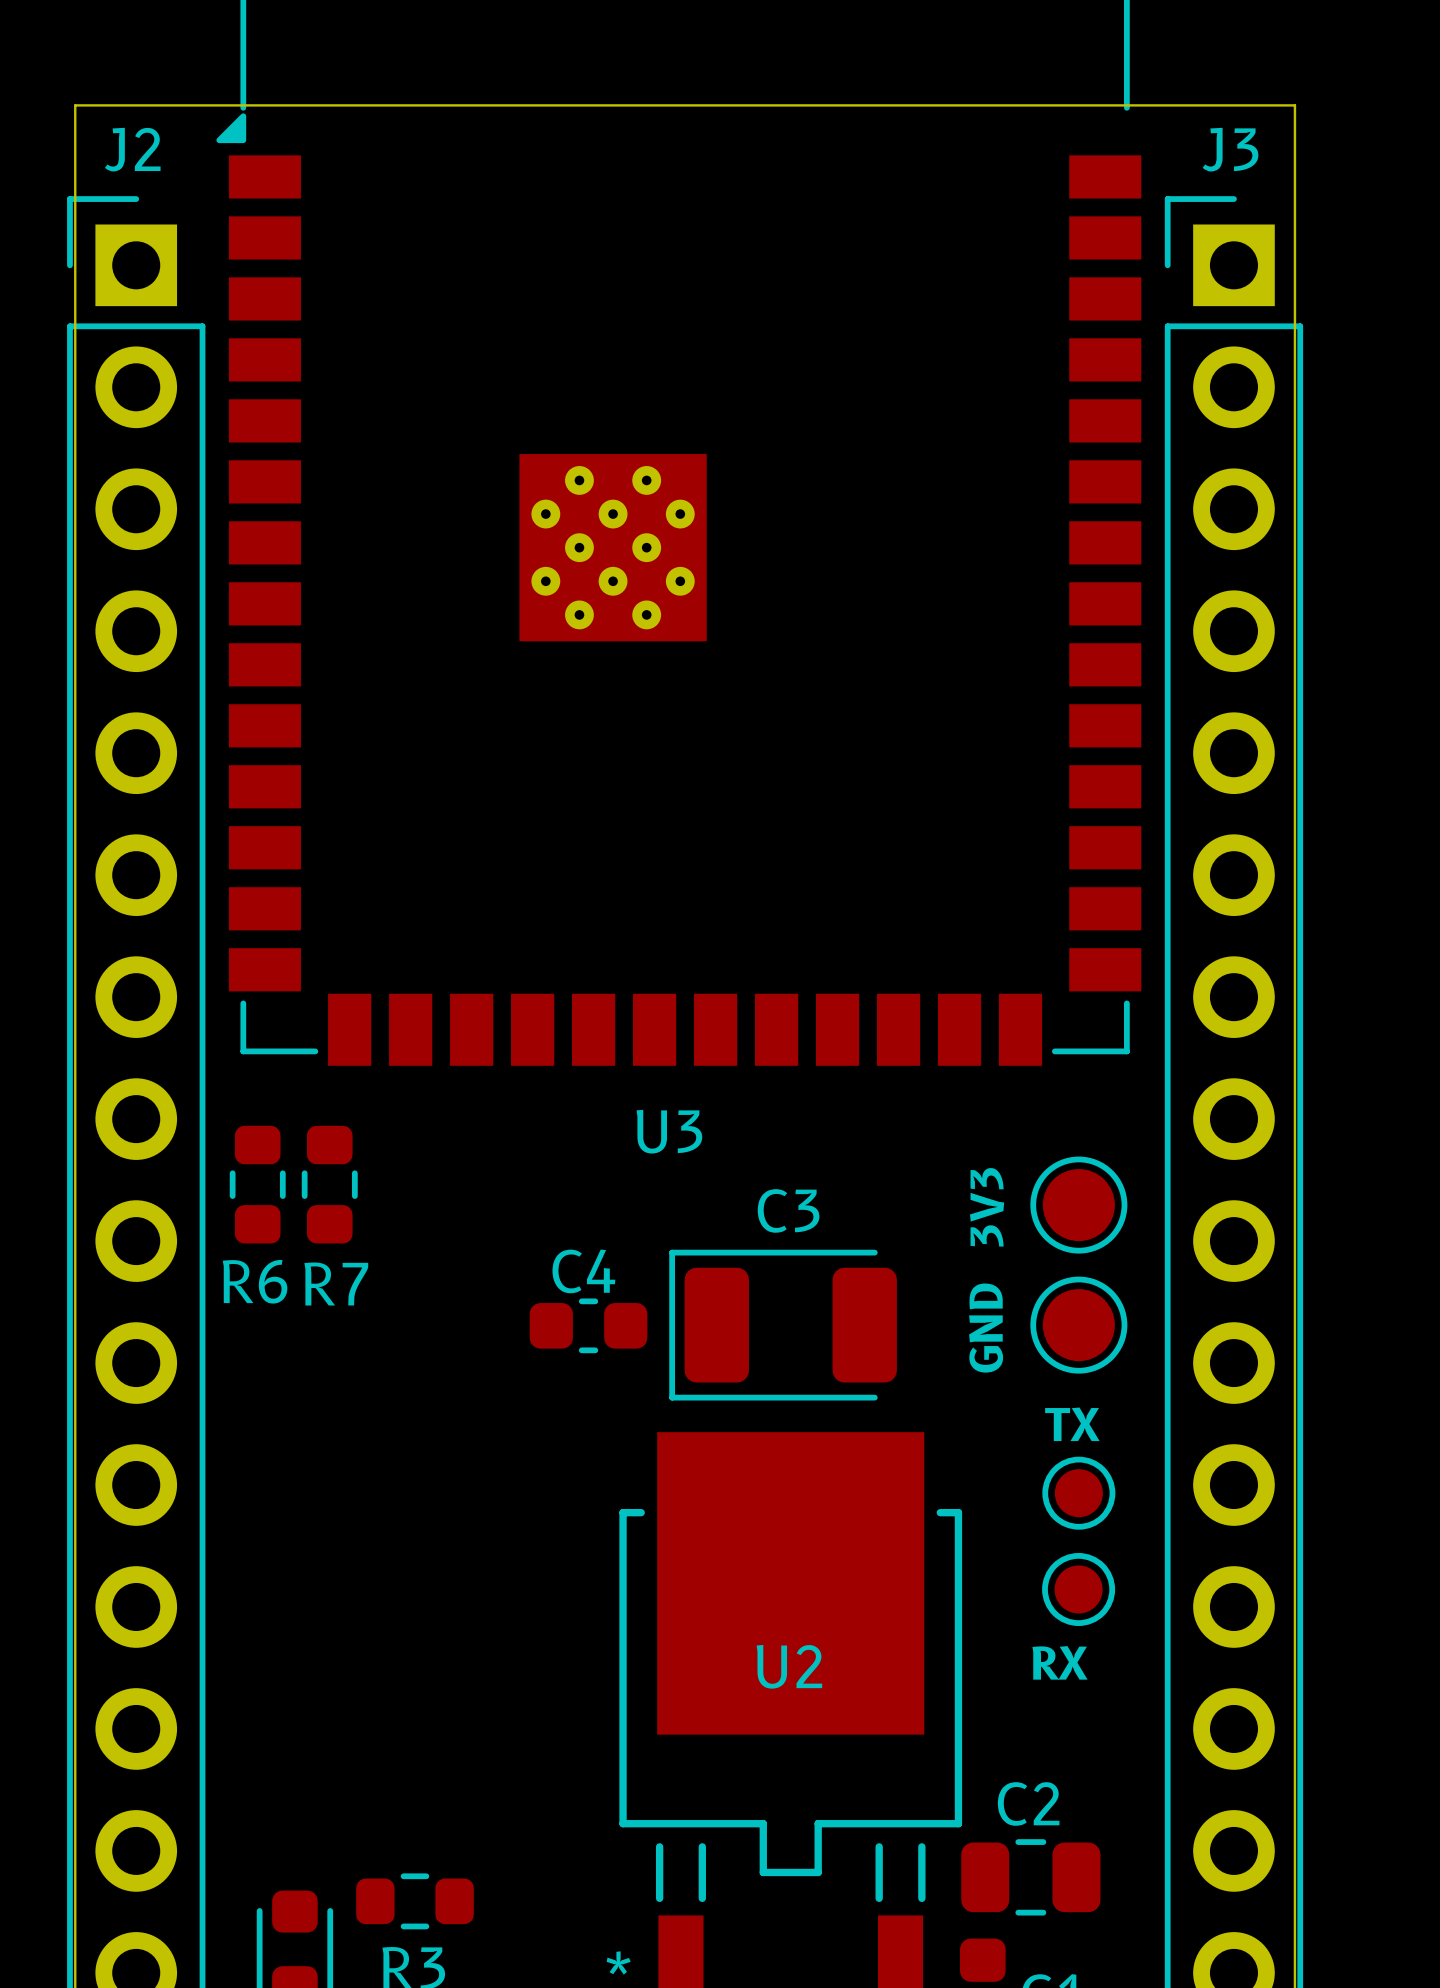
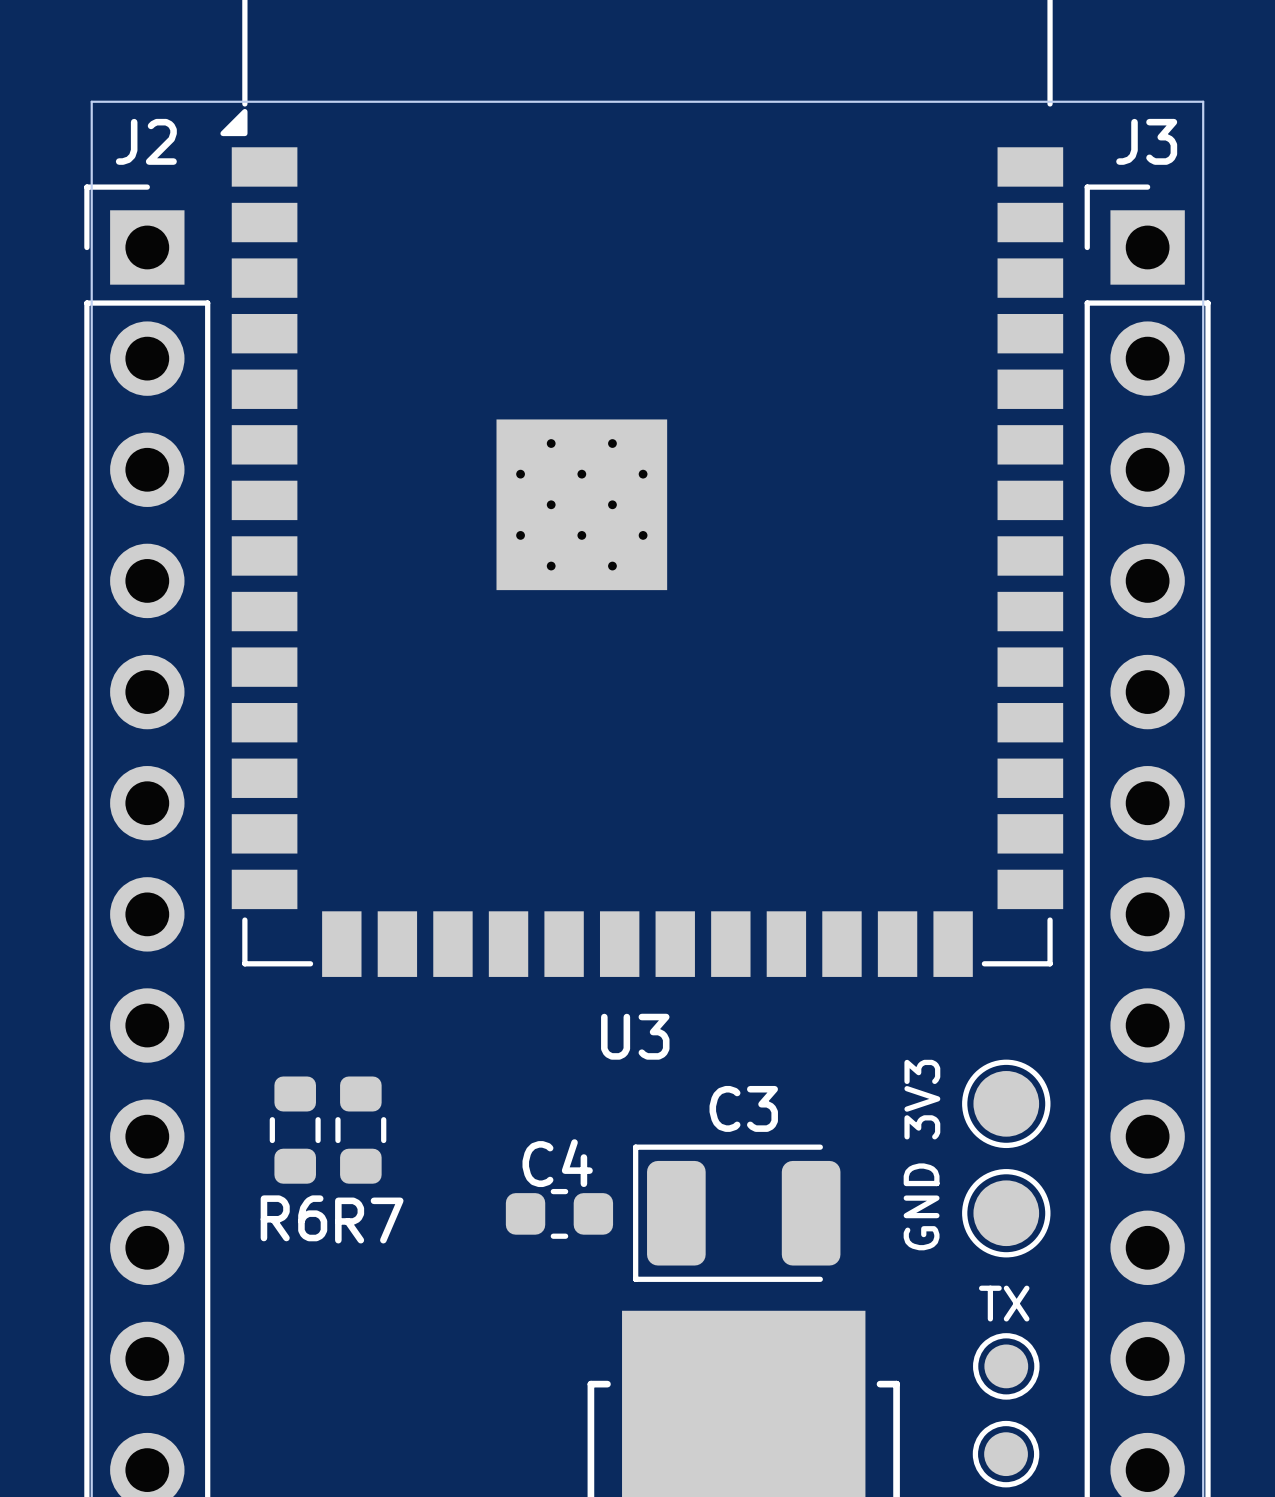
R6 position: (257, 1184) -> (295, 1130)
R7 position: (329, 1184) -> (360, 1130)

